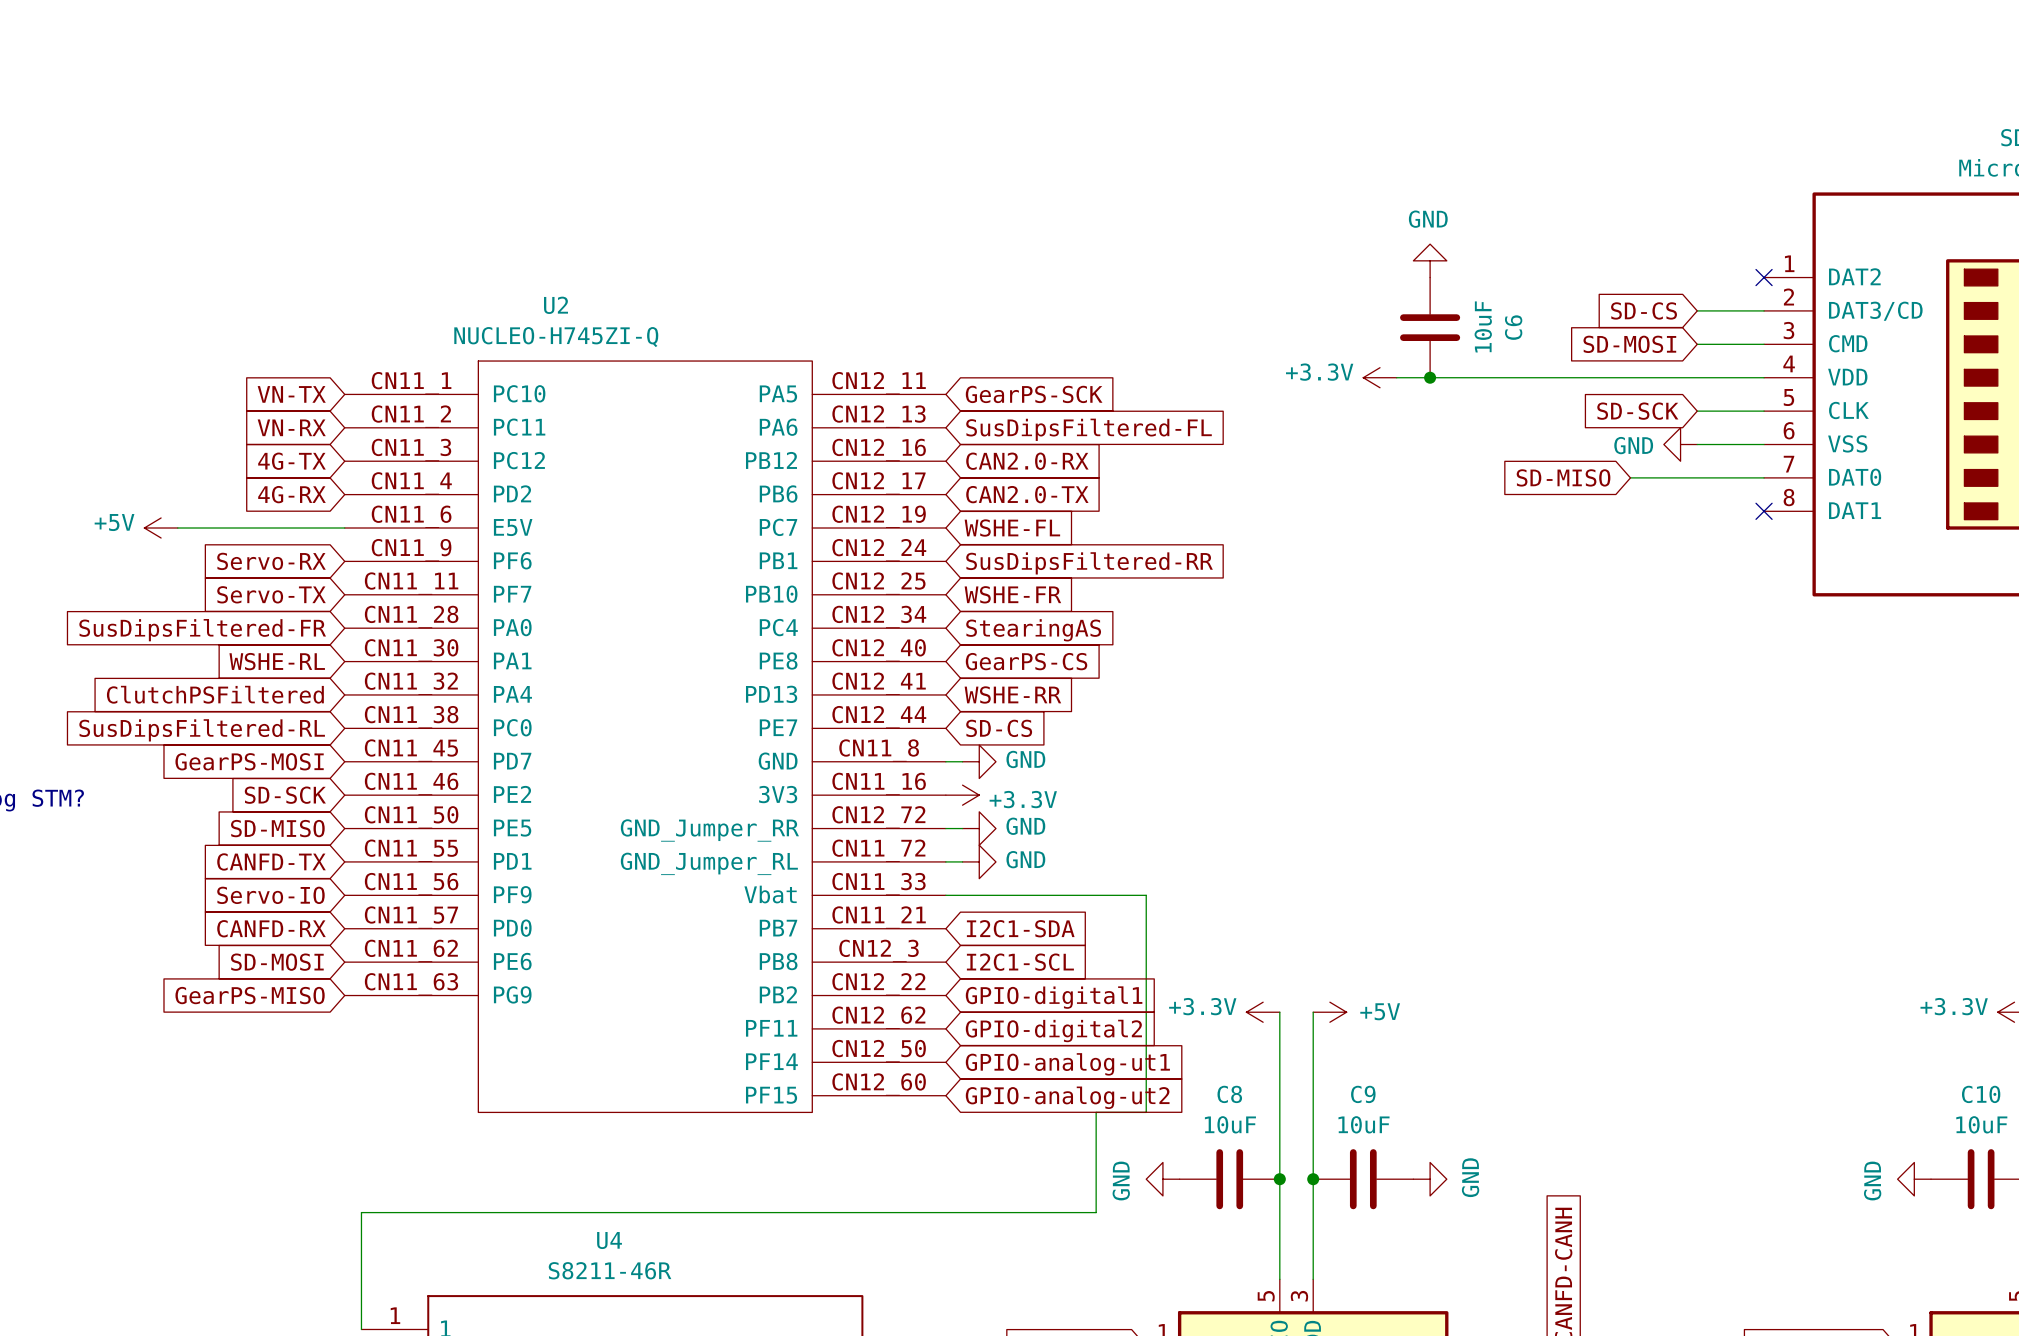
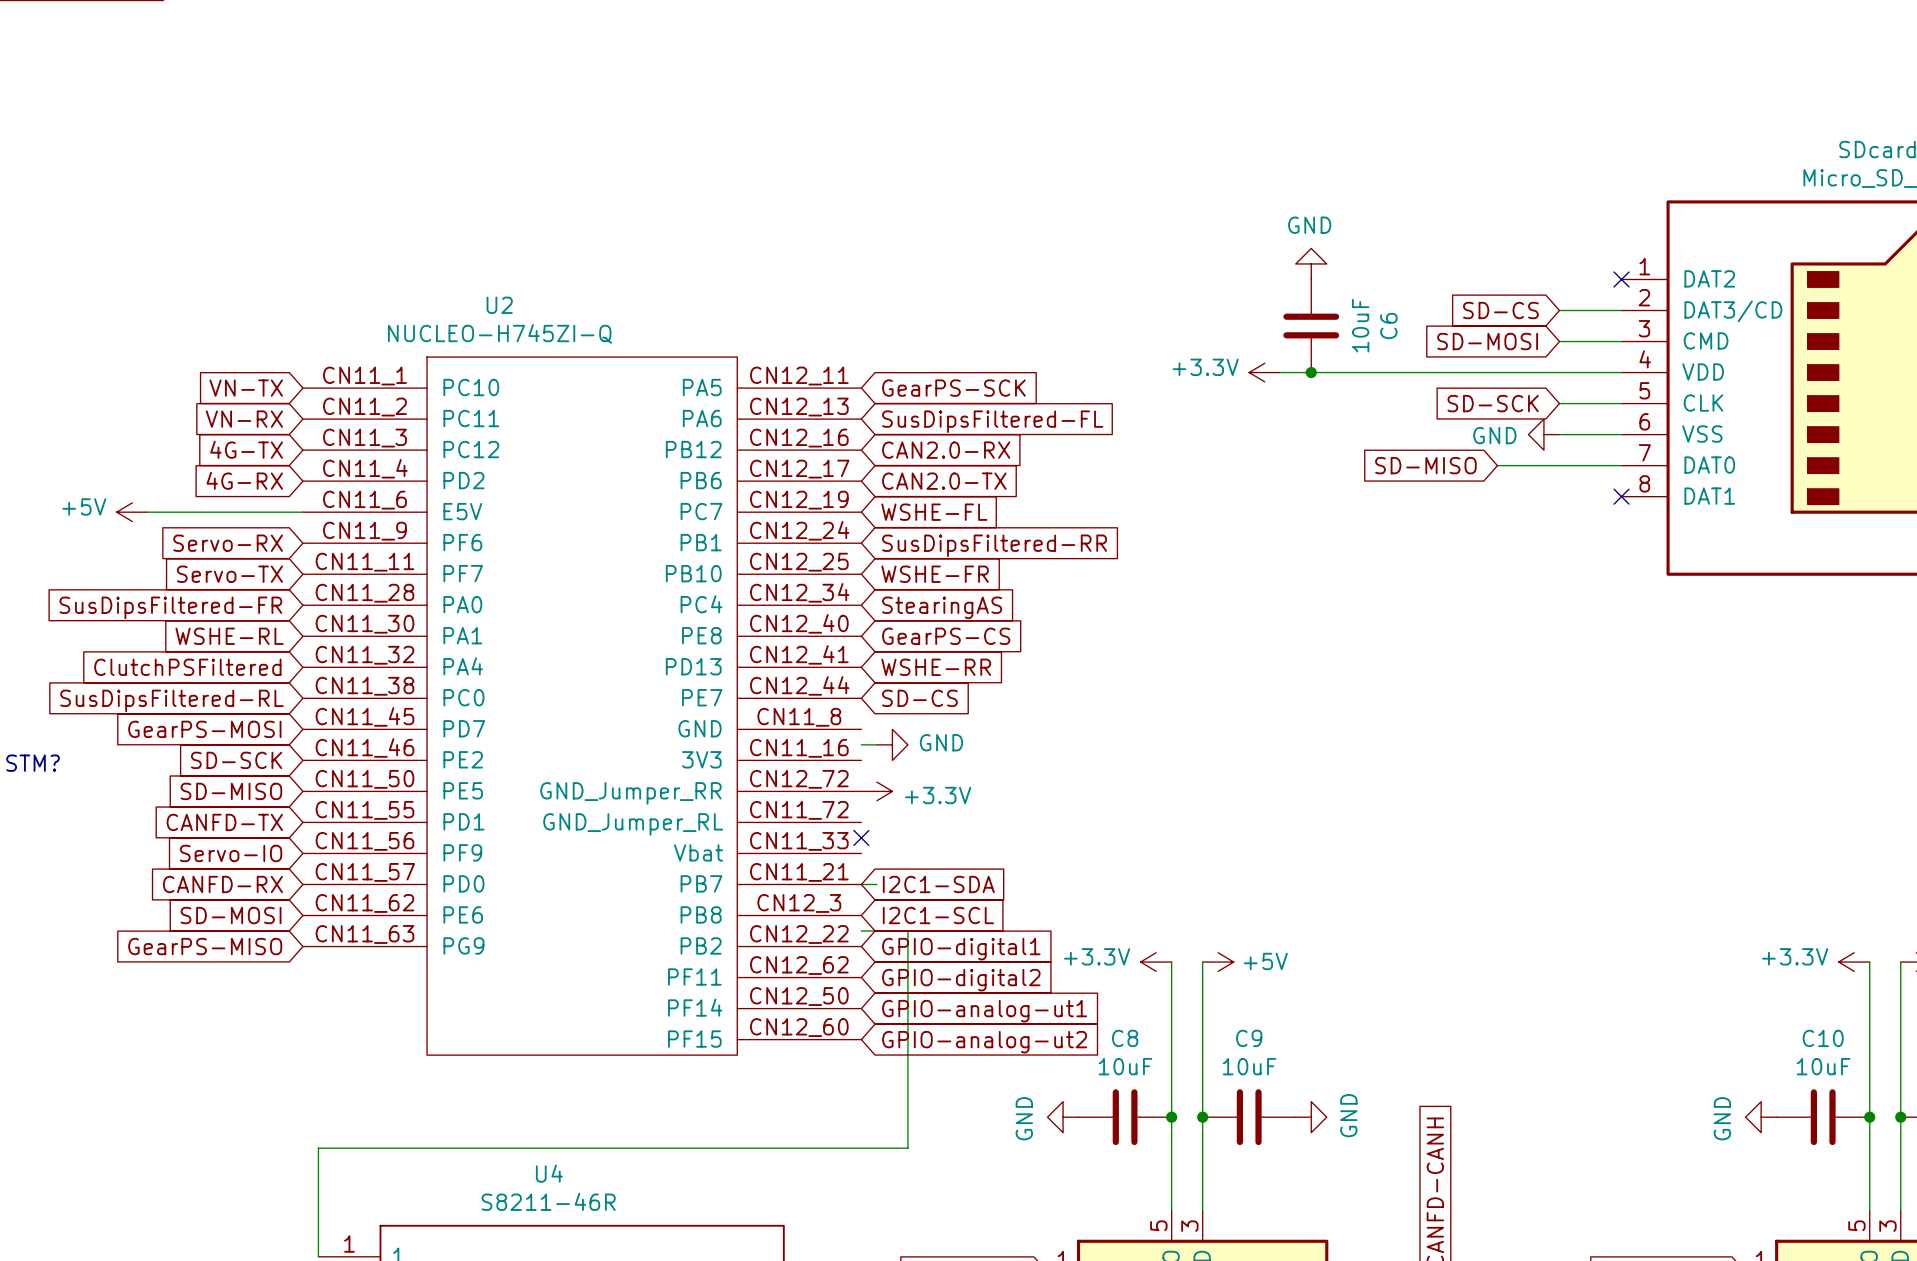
wire: (945, 761) (962, 761) -> (861, 744) (876, 744)
power symbol position: GND (979, 761) -> GND (892, 744)
power symbol position: +3.3V (962, 795) -> +3.3V (876, 791)
power symbol: GND (979, 828) -> none
wire: (945, 861) (962, 861) -> (861, 884) (876, 884)
power symbol: GND (979, 861) -> none
no-connect mark: none -> (861, 837)
wire: (945, 895) (1146, 895) (1146, 1112) (1096, 1112) (1096, 1212) (995, 1212) -> (861, 931) (907, 931) (907, 1148)

